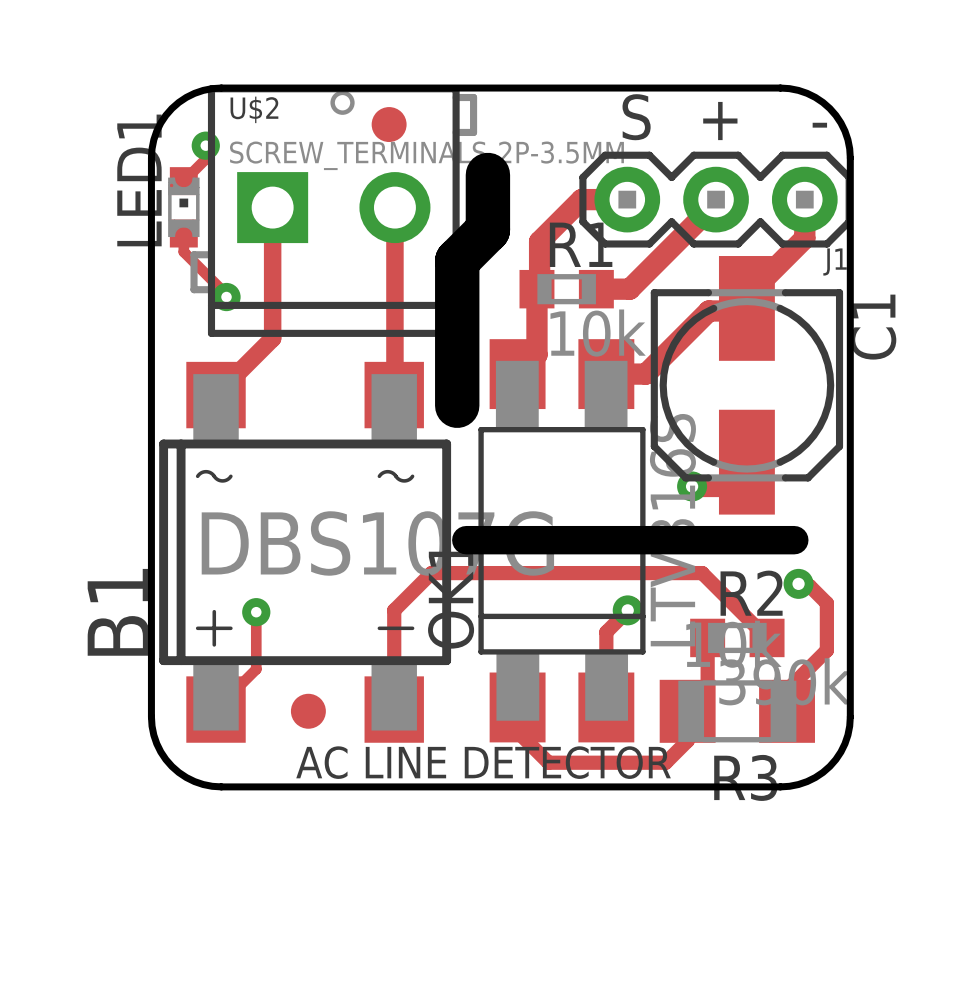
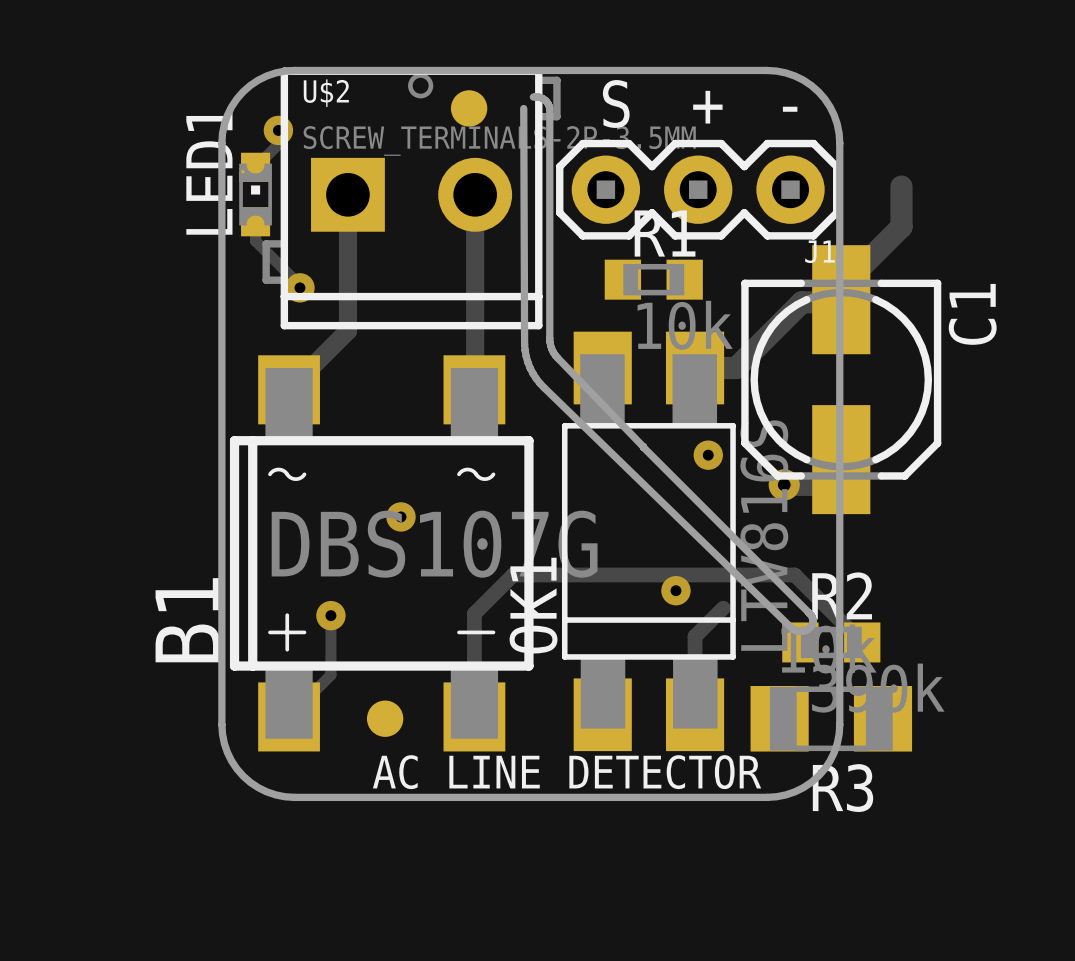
board edge: (675, 88) (780, 88) (807, 93) (829, 108) (840, 122) (847, 139) (850, 157) (850, 717) (847, 735) (840, 751) (829, 766) (815, 777) (798, 784) (780, 786) (675, 786) -> (767, 70) (794, 75) (818, 91) (834, 115) (839, 143) (839, 734) (830, 761) (811, 782) (794, 791) (767, 797)
board edge: none -> (533, 97) (543, 99) (549, 108) (550, 345) (557, 357) (643, 446)
text position: S (636, 117) -> S (616, 103)
text position: + (720, 121) -> + (707, 107)
board edge: none -> (523, 108) (524, 344) (527, 362) (532, 373) (544, 387) (792, 628) (800, 631) (809, 627) (812, 620) (809, 613)
text position: - (819, 125) -> - (790, 109)
board edge: (487, 174) (487, 230) (457, 260) (457, 405) -> none
track: (627, 199) (581, 199) (539, 241) (539, 286) (536, 289) (536, 354) (517, 374) -> none
track: (716, 199) (716, 202) (629, 289) (596, 289) -> none
J1 position: (716, 199) -> (698, 189)
board edge: none -> (643, 447) (808, 612)
via: none -> (708, 455)
via: none -> (401, 516)
board edge: (466, 540) (794, 540) -> none
track: (798, 583) (800, 586) (809, 586) (826, 603) (826, 650) (787, 690) (787, 711) -> none
via: (798, 583) -> none
via: none -> (675, 590)
via: (627, 610) -> none
track: (707, 637) (707, 691) (687, 711) (687, 740) (665, 762) (548, 762) (515, 729) (515, 709) (517, 707) -> none

